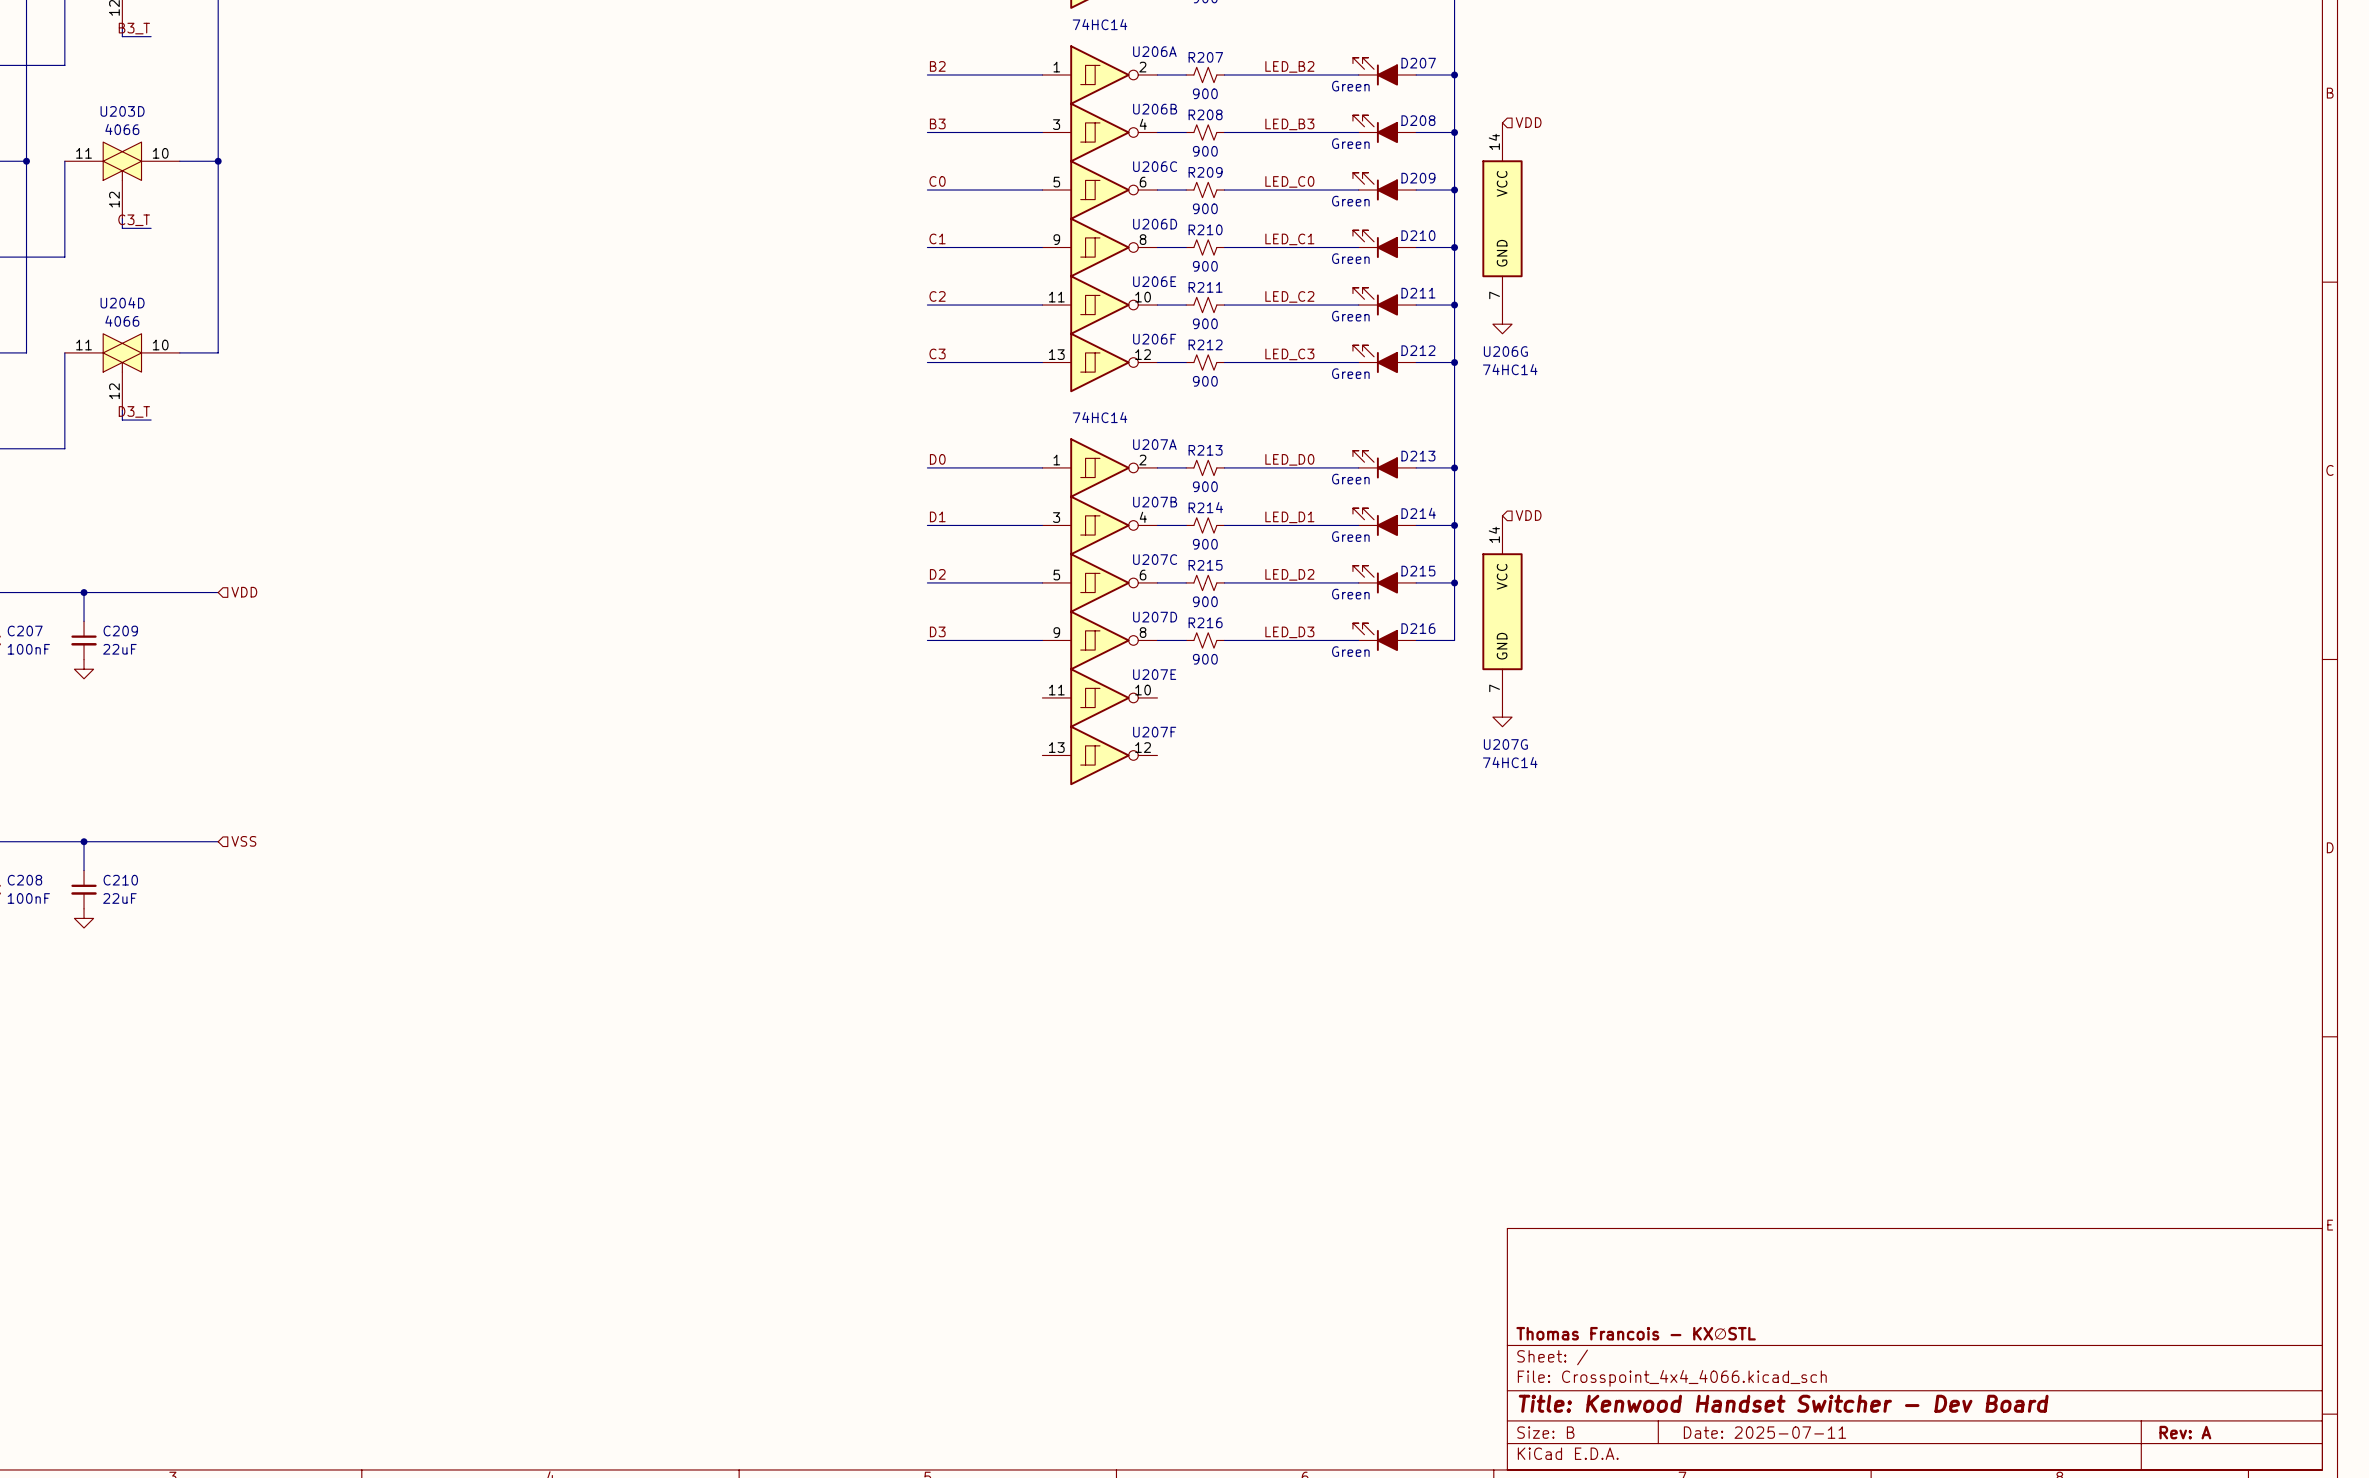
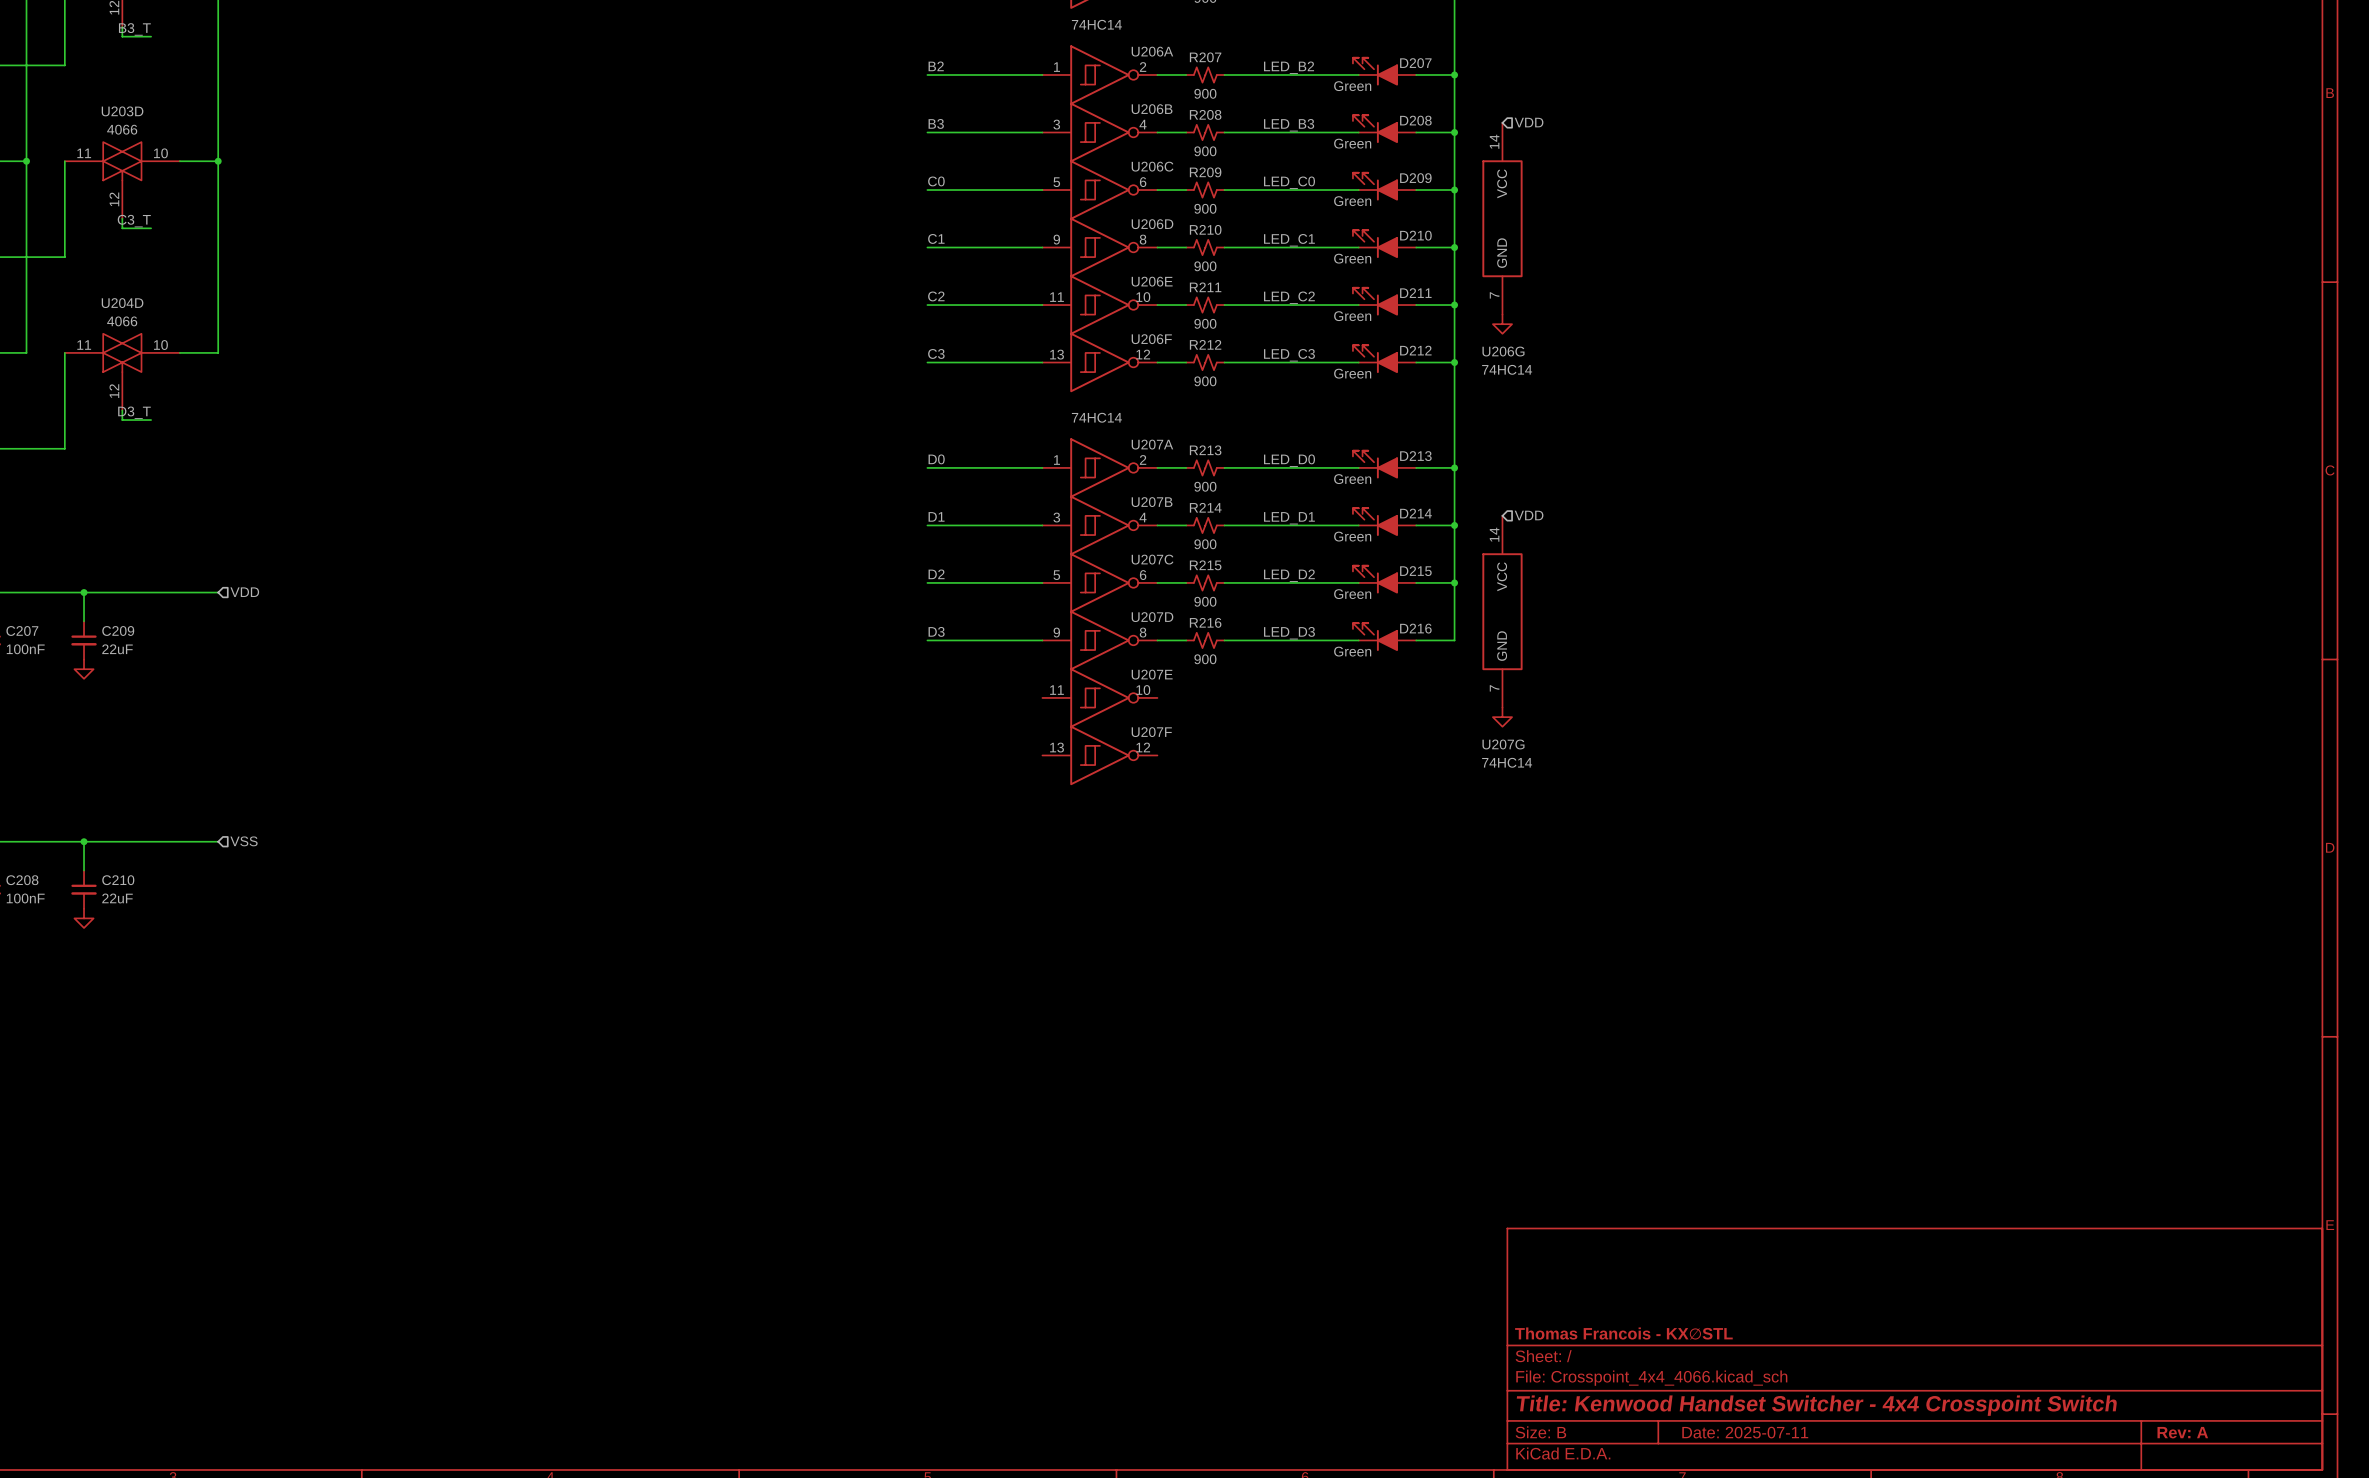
title block: Title: Kenwood Handset Switcher - Dev Board (1783, 1403) -> Title: Kenwood Handset Switcher - 4x4 Crosspoint Switch (1816, 1405)

